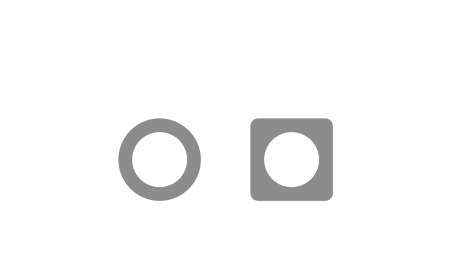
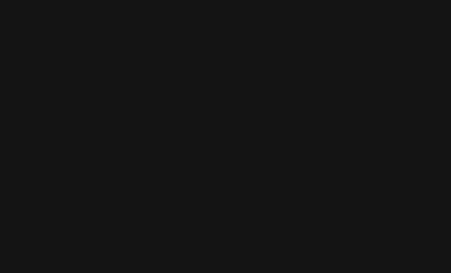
part: (225, 159) -> none

